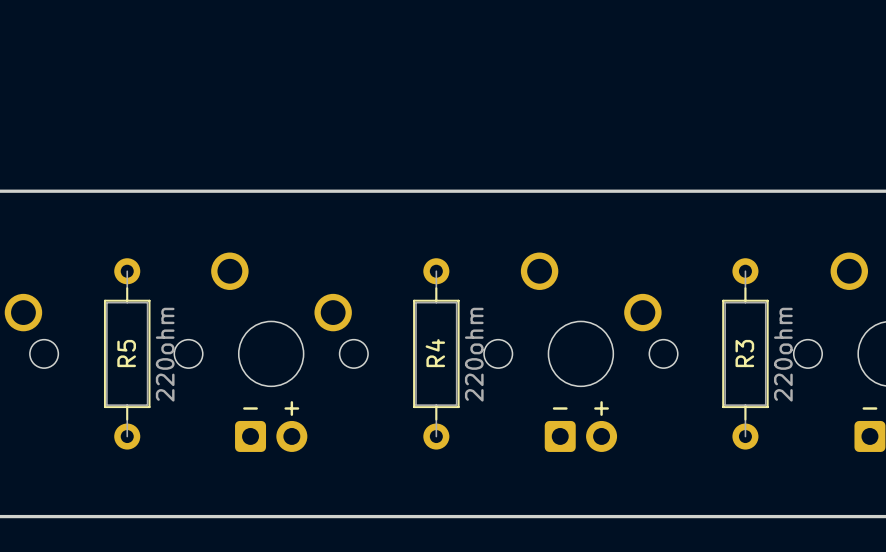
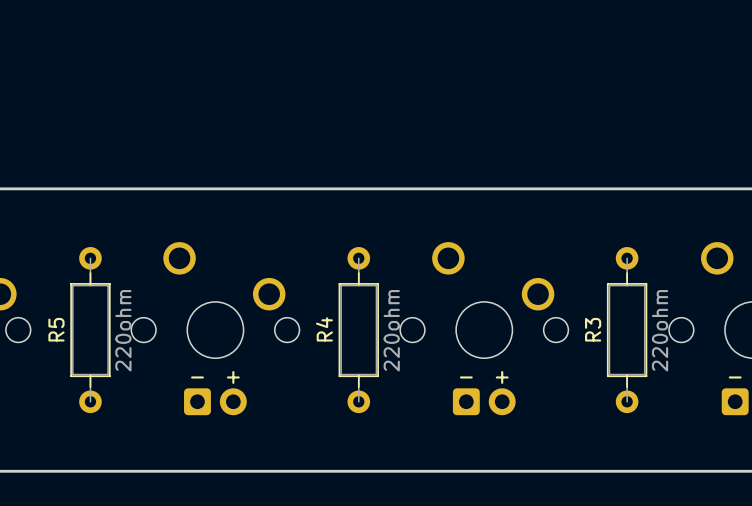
R5 name position: R5 (126, 353) -> R5 (56, 329)
R4 name position: R4 (435, 353) -> R4 (324, 329)
R3 name position: R3 (744, 353) -> R3 (593, 329)

